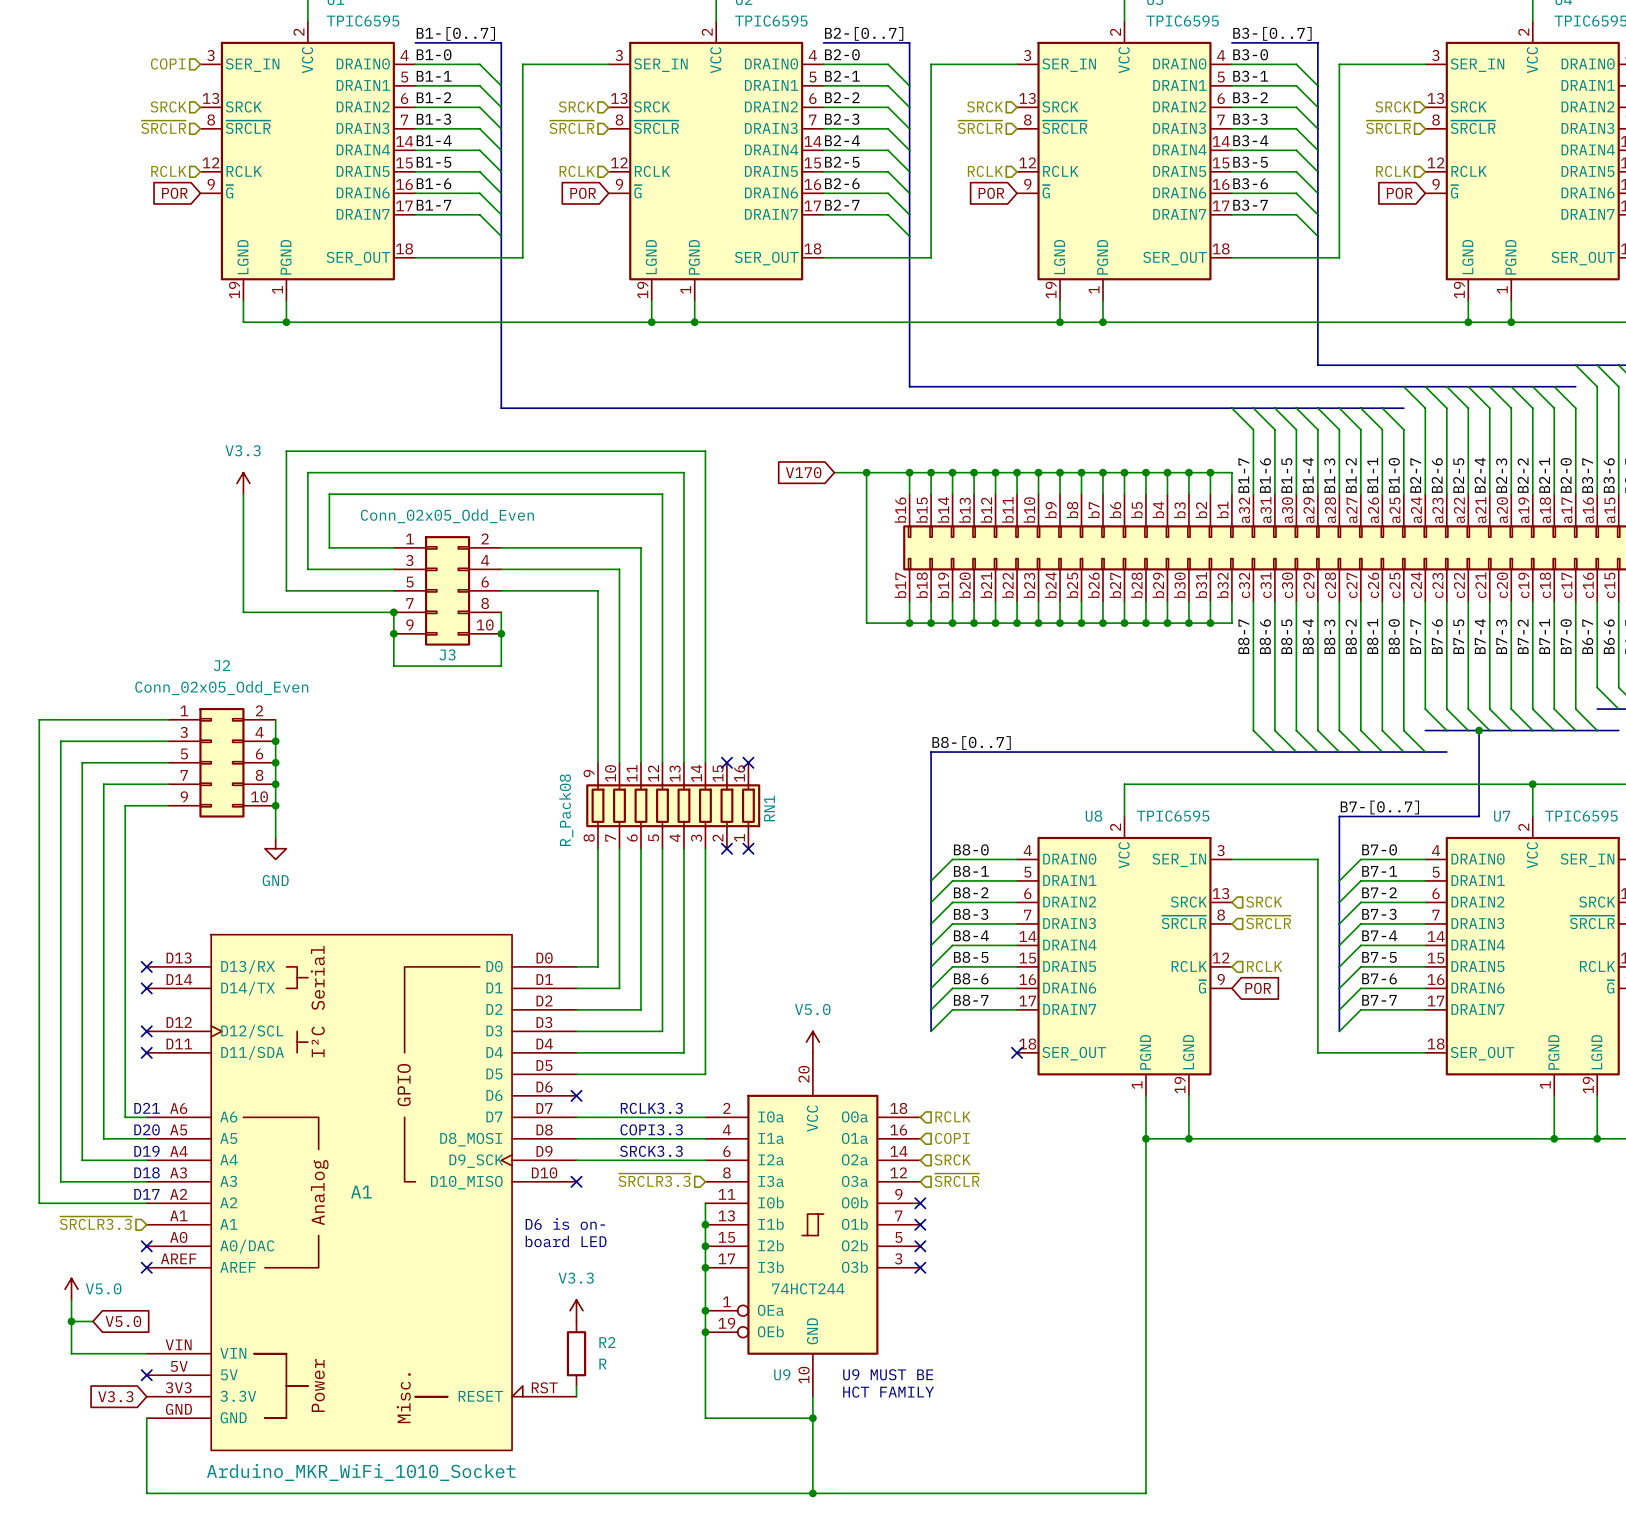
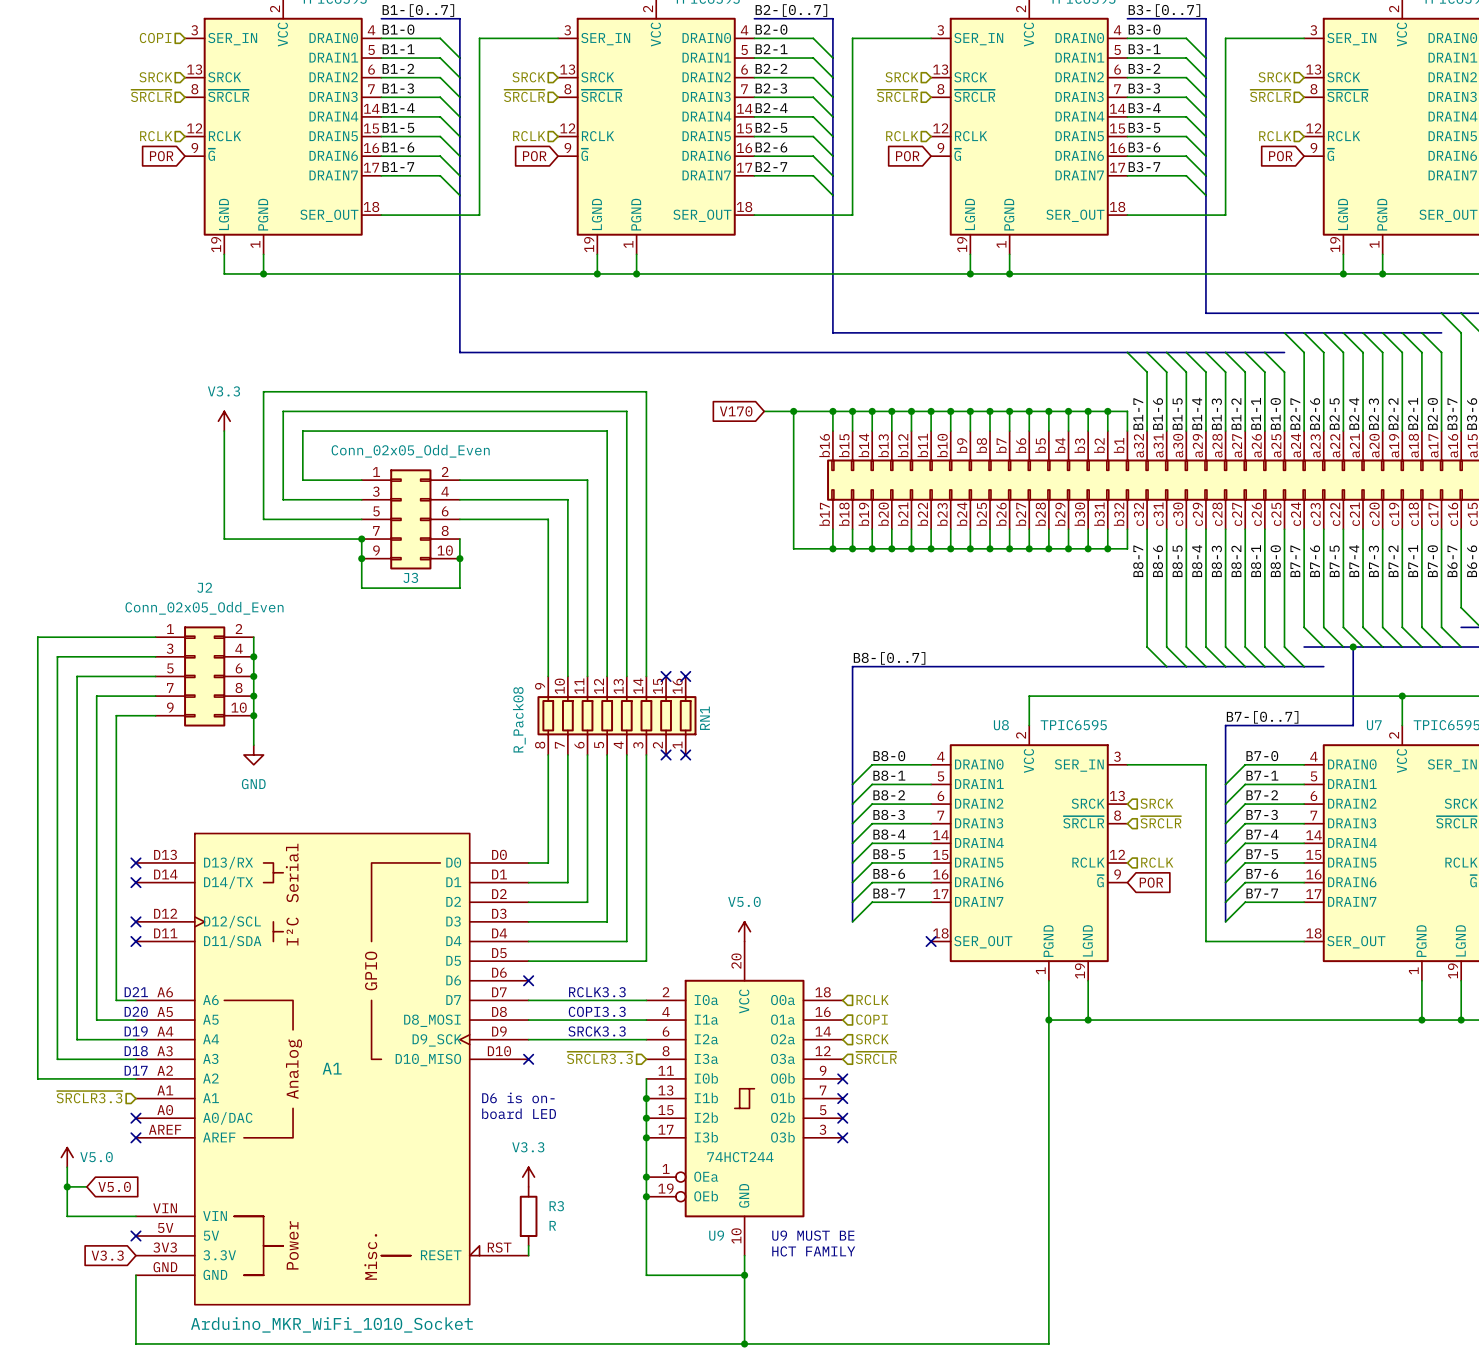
R2 name: R2 (607, 1342) -> R3 (556, 1206)

